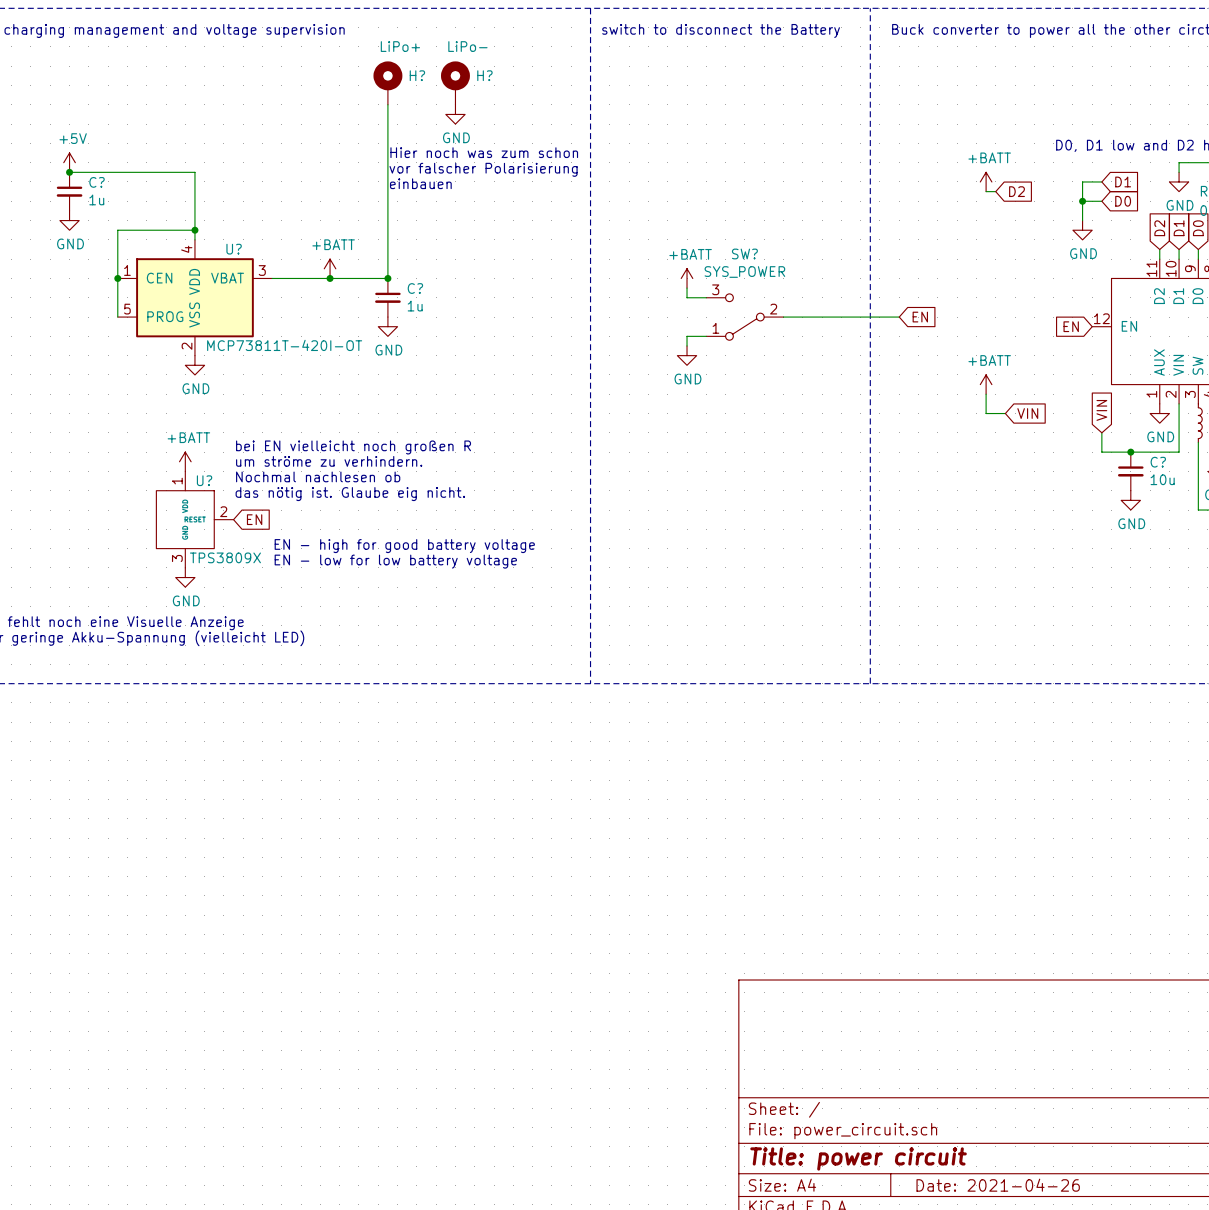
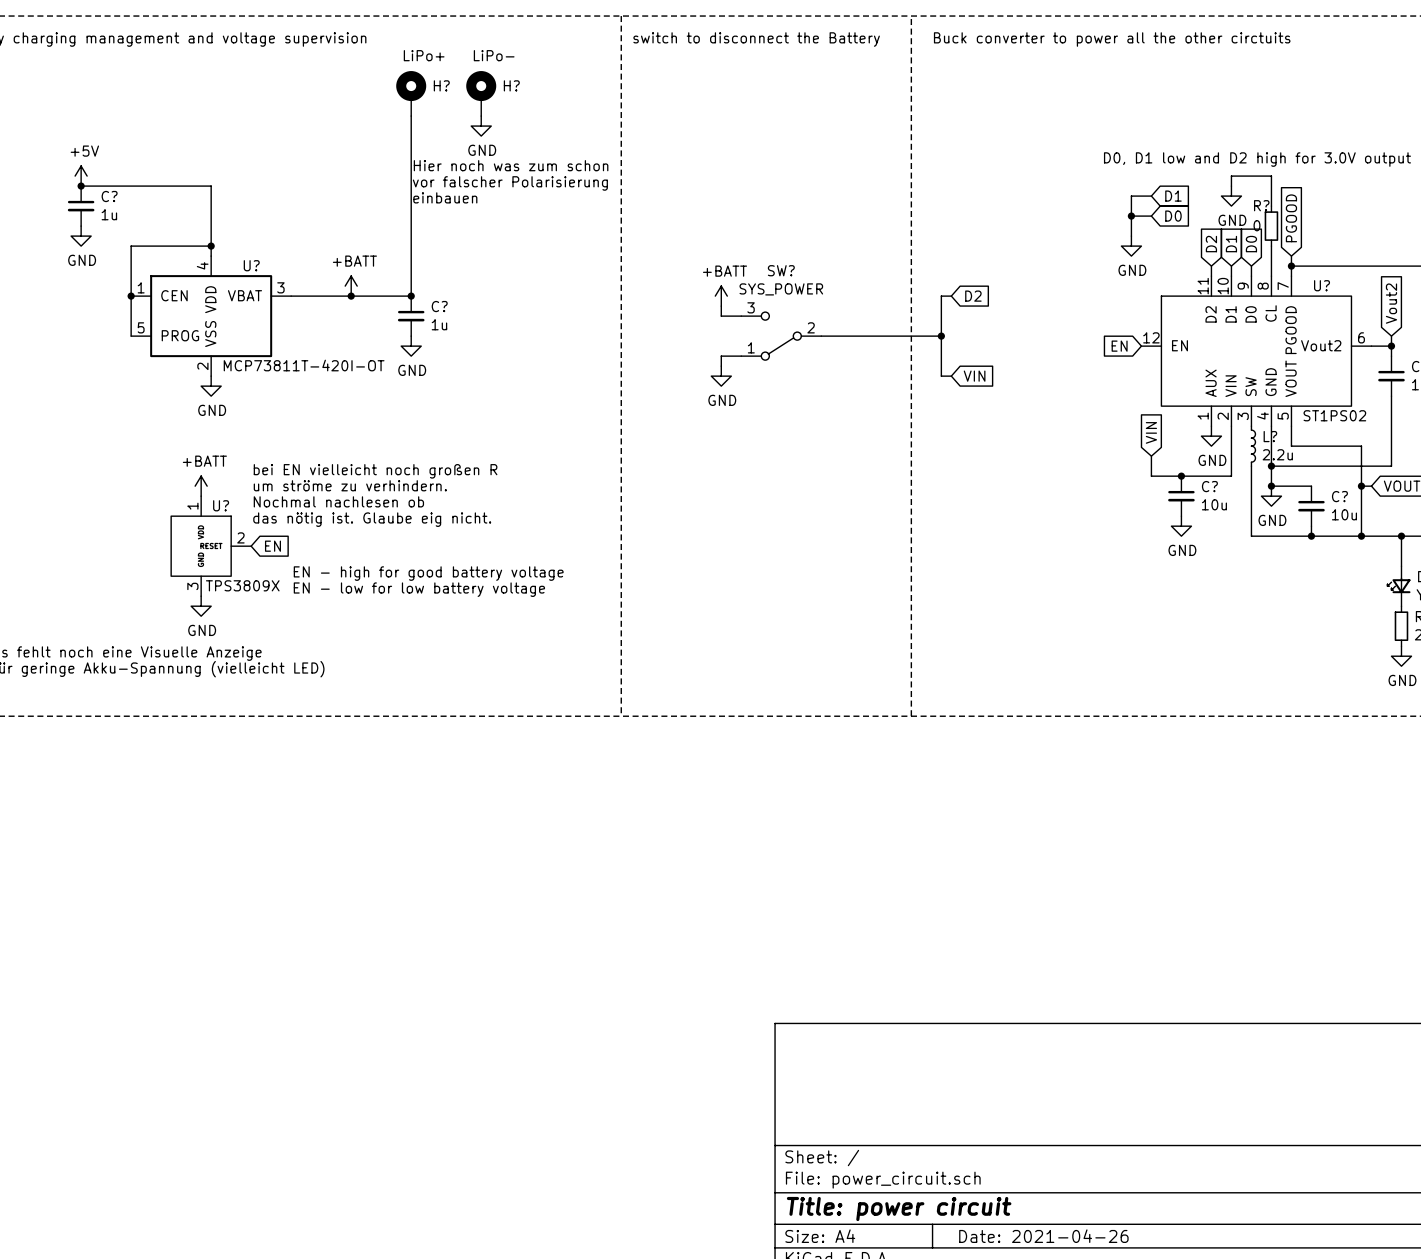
power symbol: +BATT (986, 181) -> none
wire: (986, 191) (995, 191) -> none
global label position: D2 (1017, 191) -> D2 (973, 296)
wire: none -> (951, 296) (941, 296) (941, 376) (951, 376)
junction: none -> (941, 336)
global label: EN (920, 317) -> none
power symbol: +BATT (986, 384) -> none
wire: (986, 394) (986, 413) (1005, 413) -> none
global label position: VIN (1027, 413) -> VIN (974, 376)

